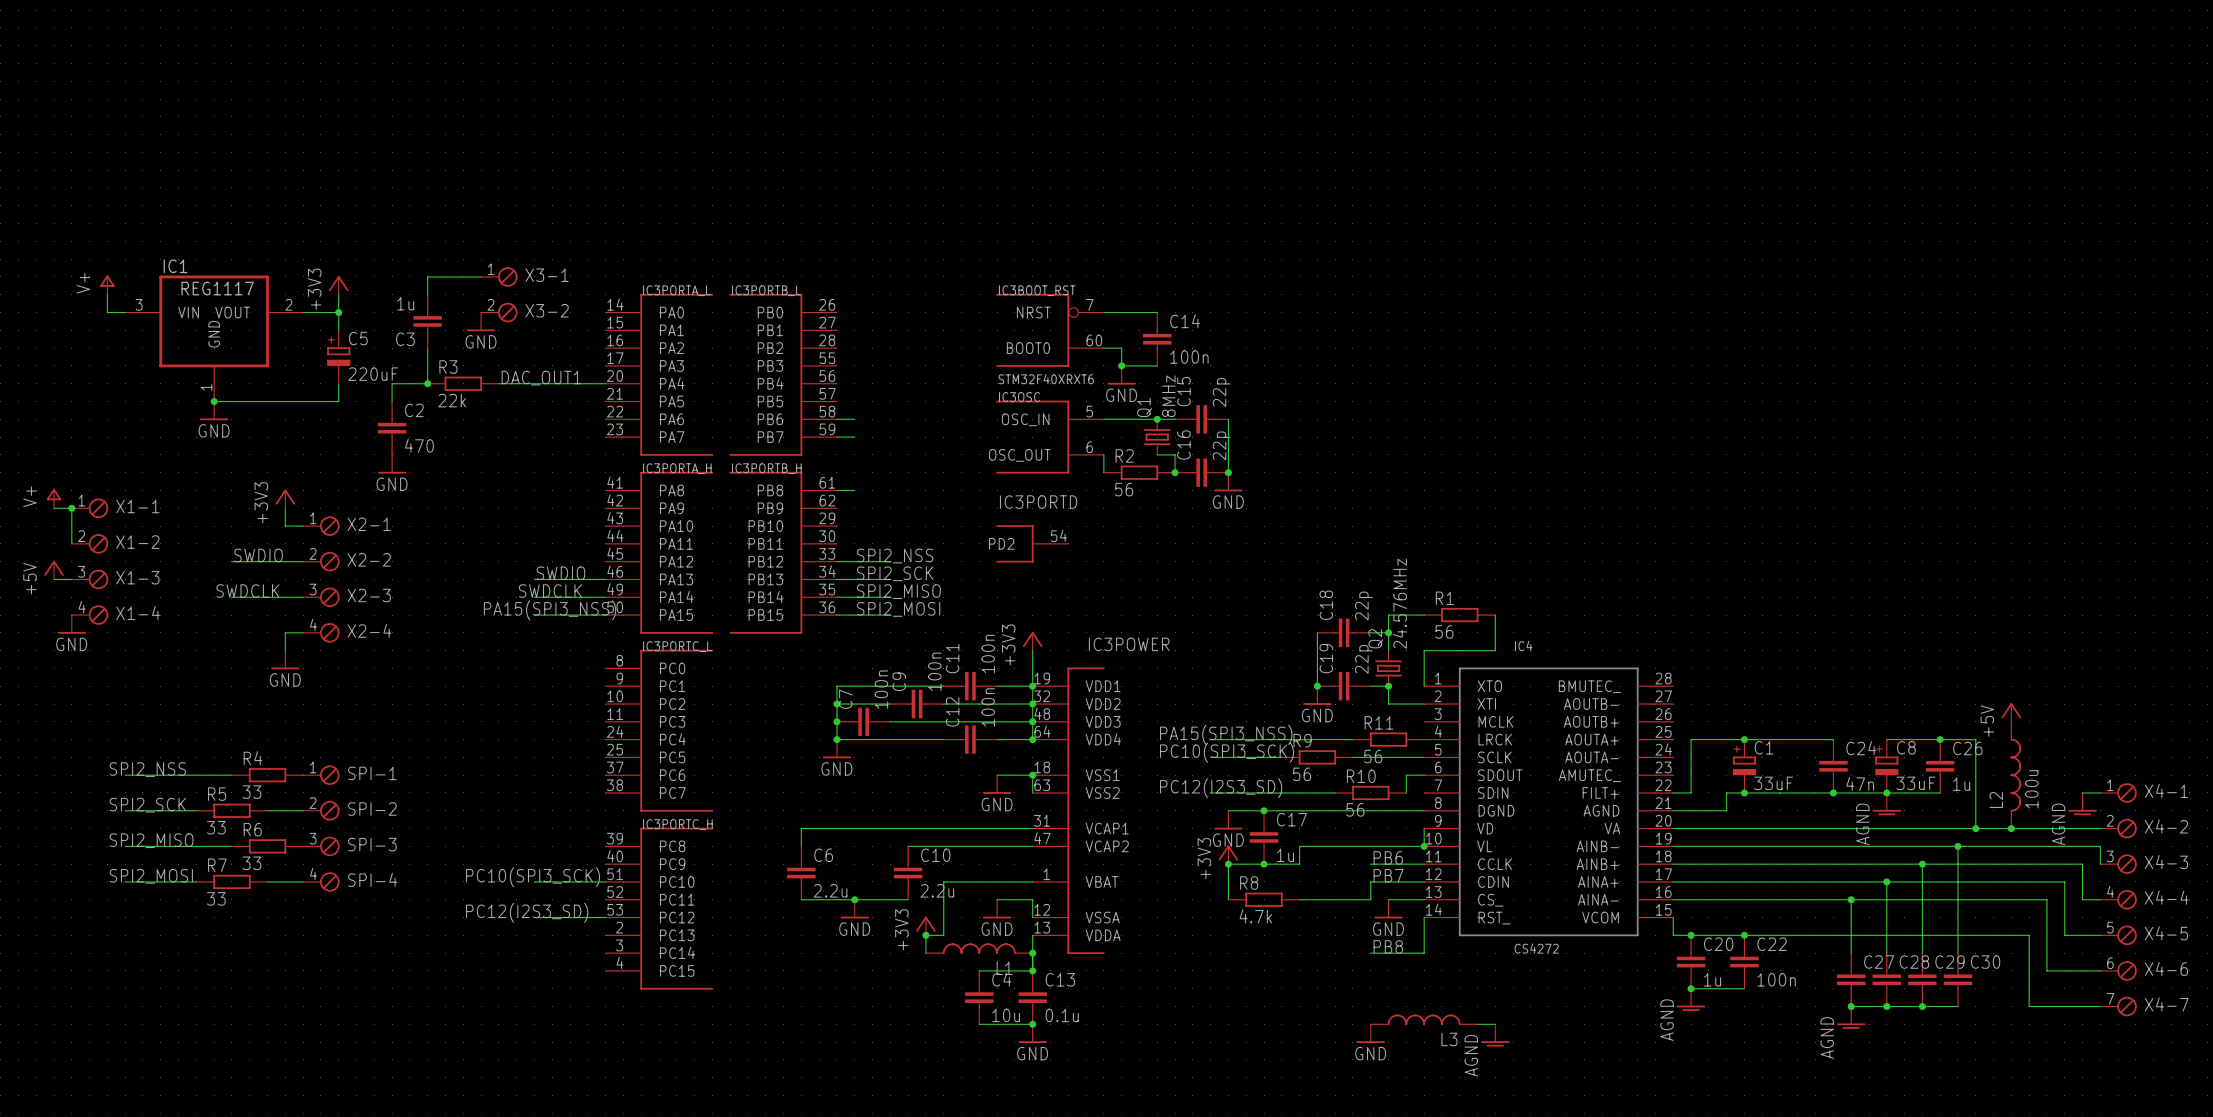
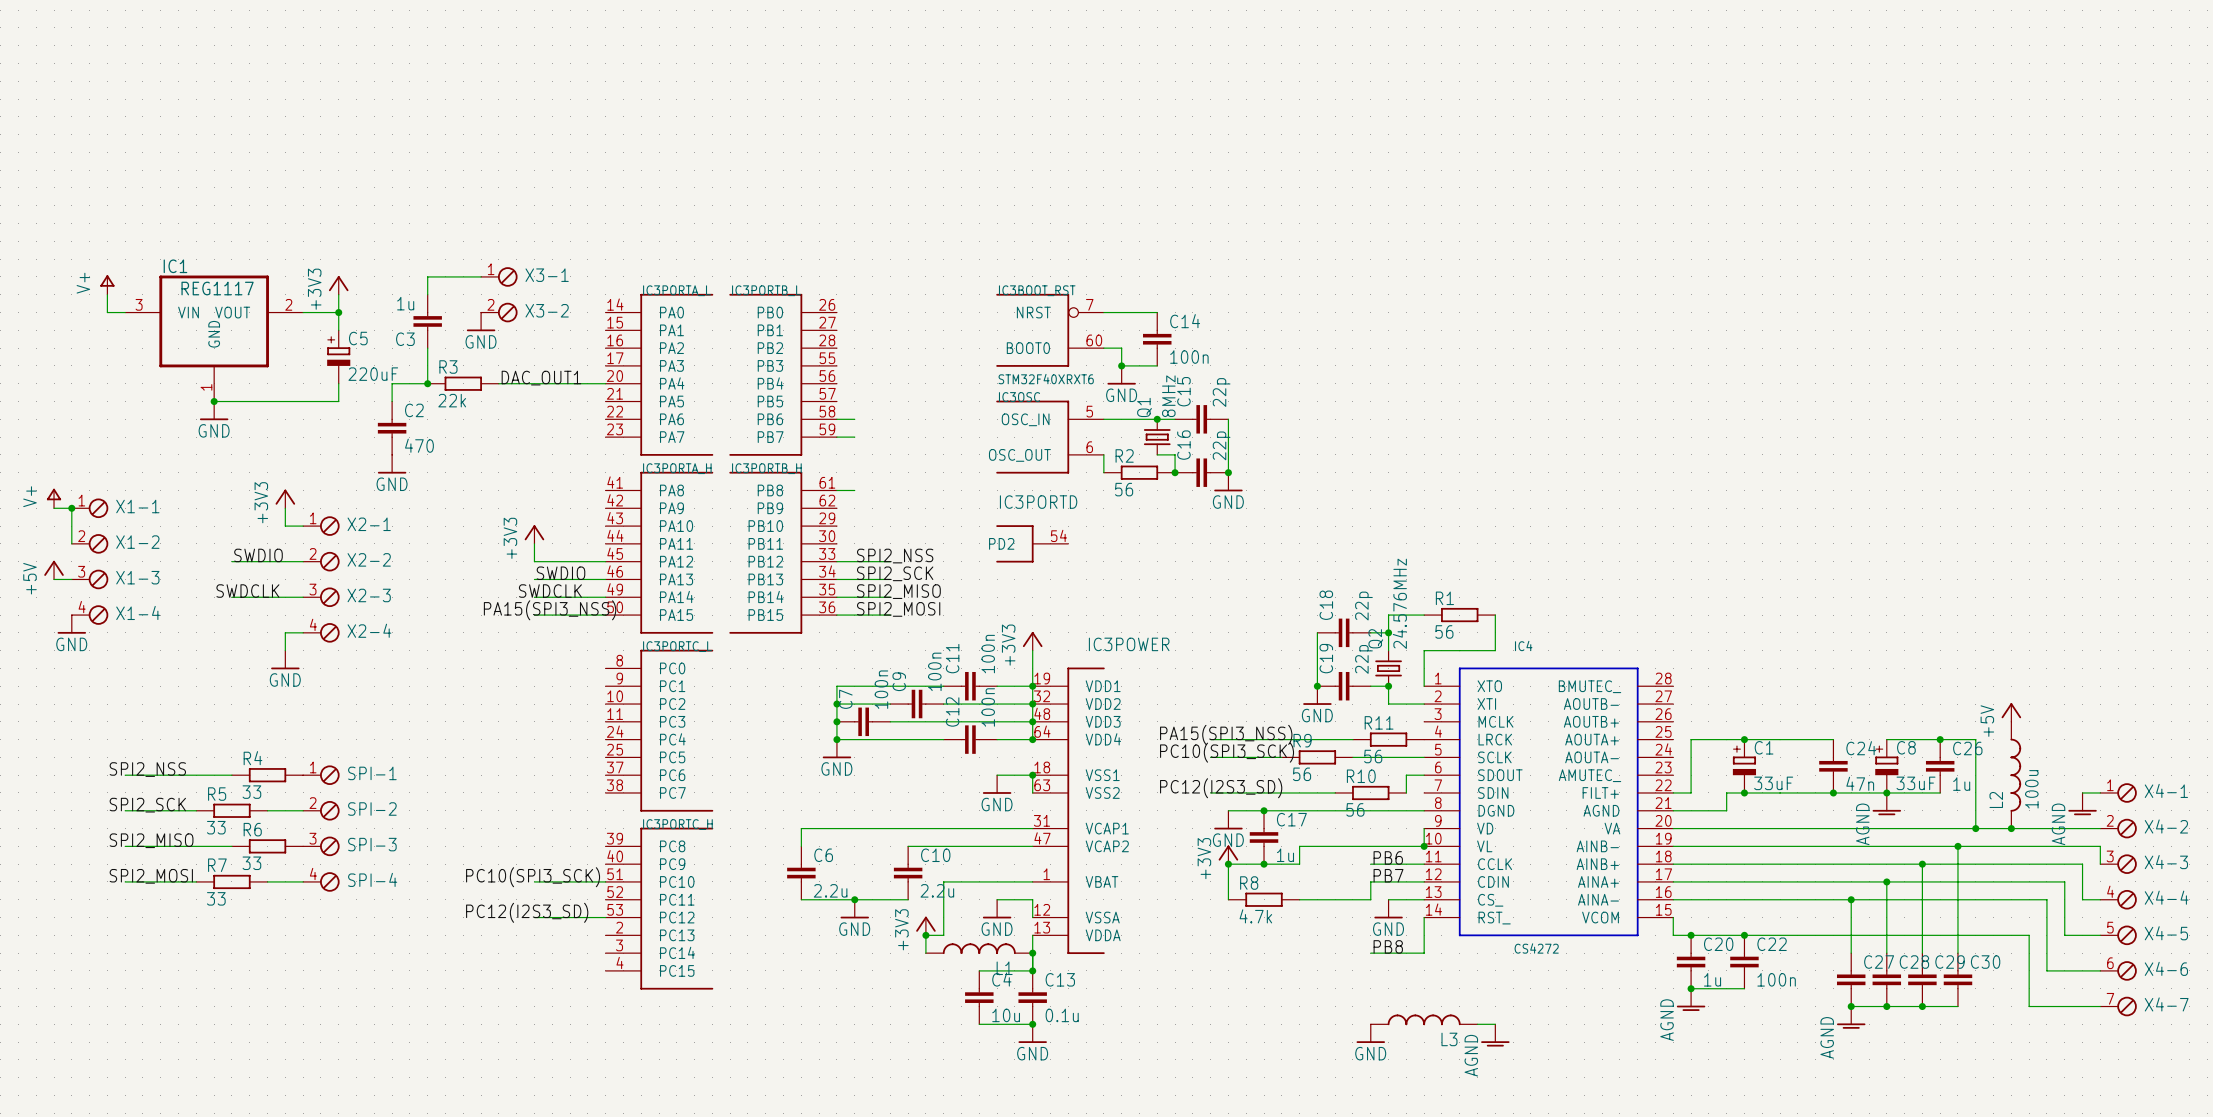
power symbol: none -> +3V3 (534, 534)
wire: none -> (534, 543) (534, 561) (605, 561)

